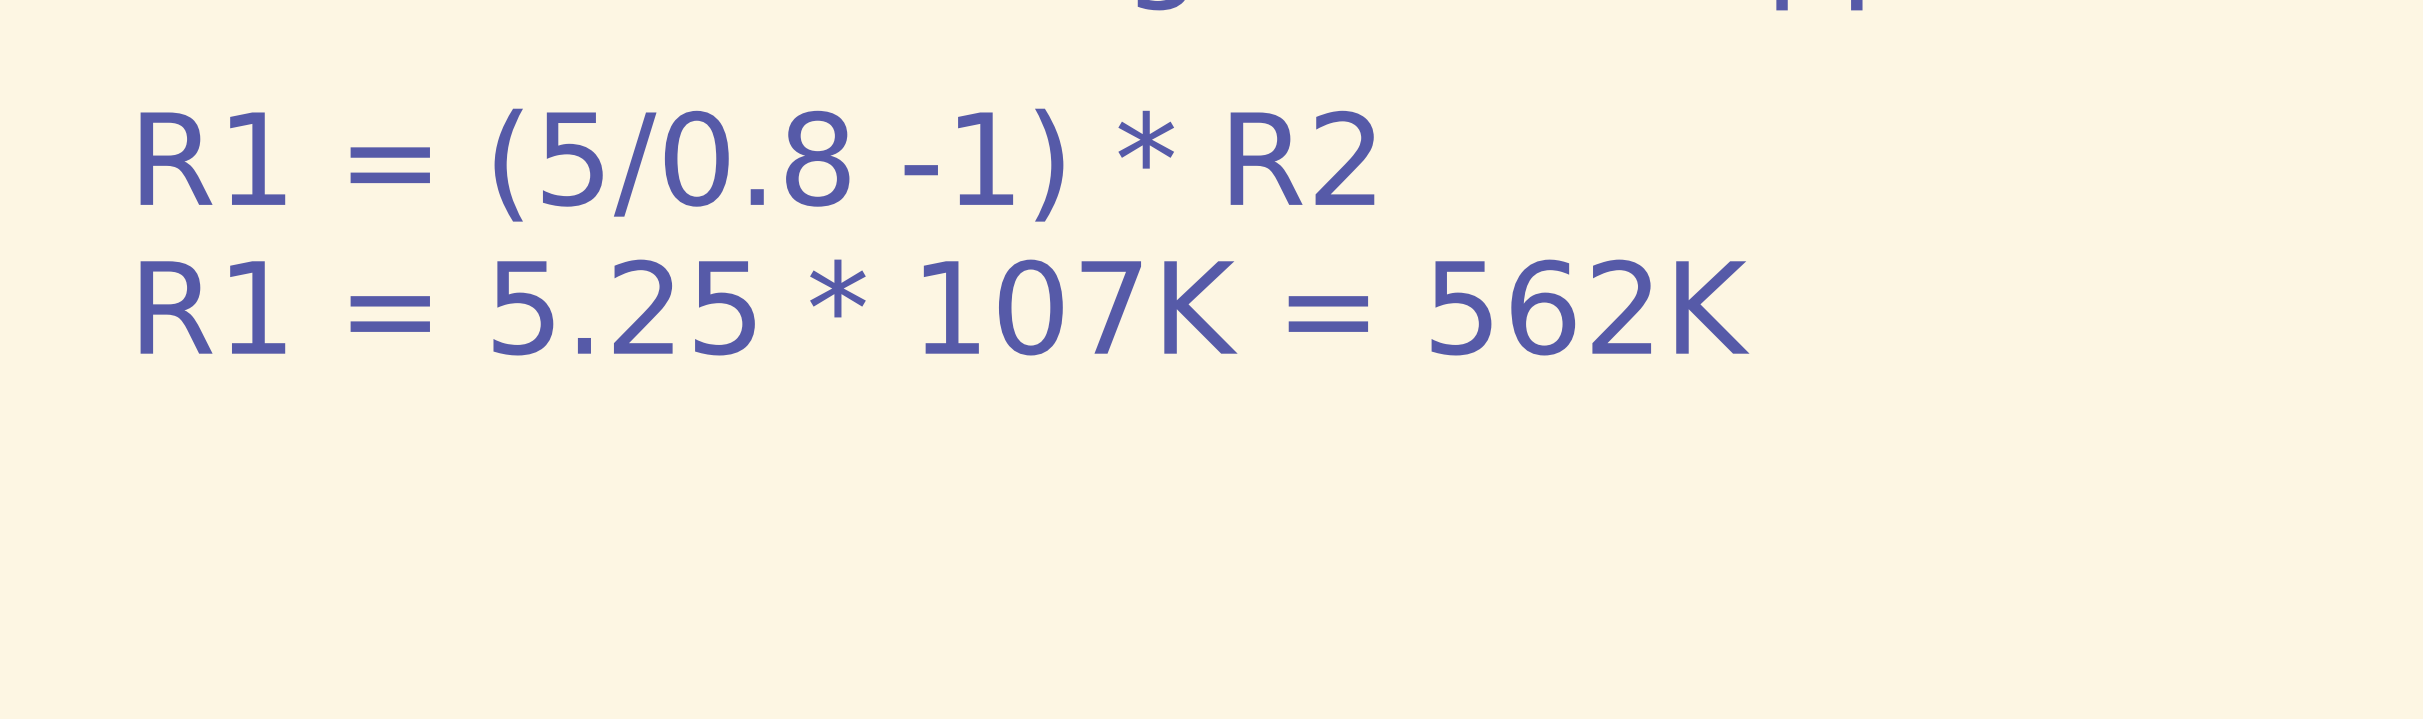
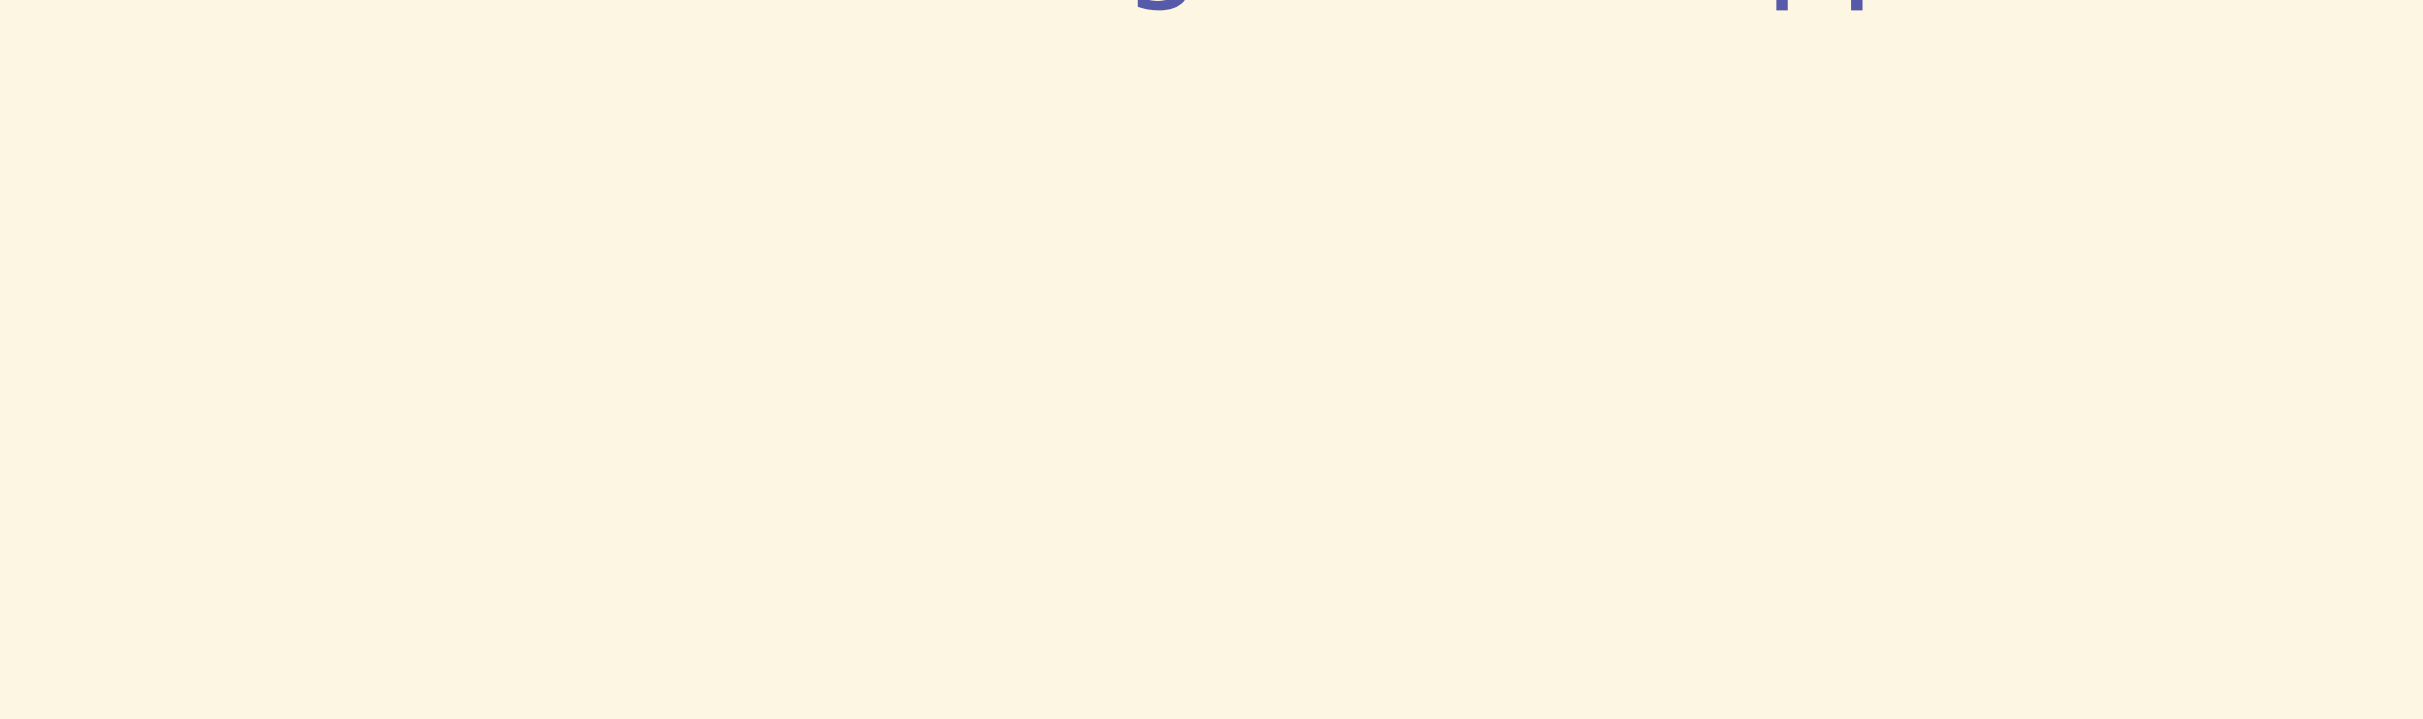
text: R1 = (5/0.8 -1) * R2 (757, 165) -> none
text: R1 = 5.25 * 107K = 562K (945, 307) -> none

